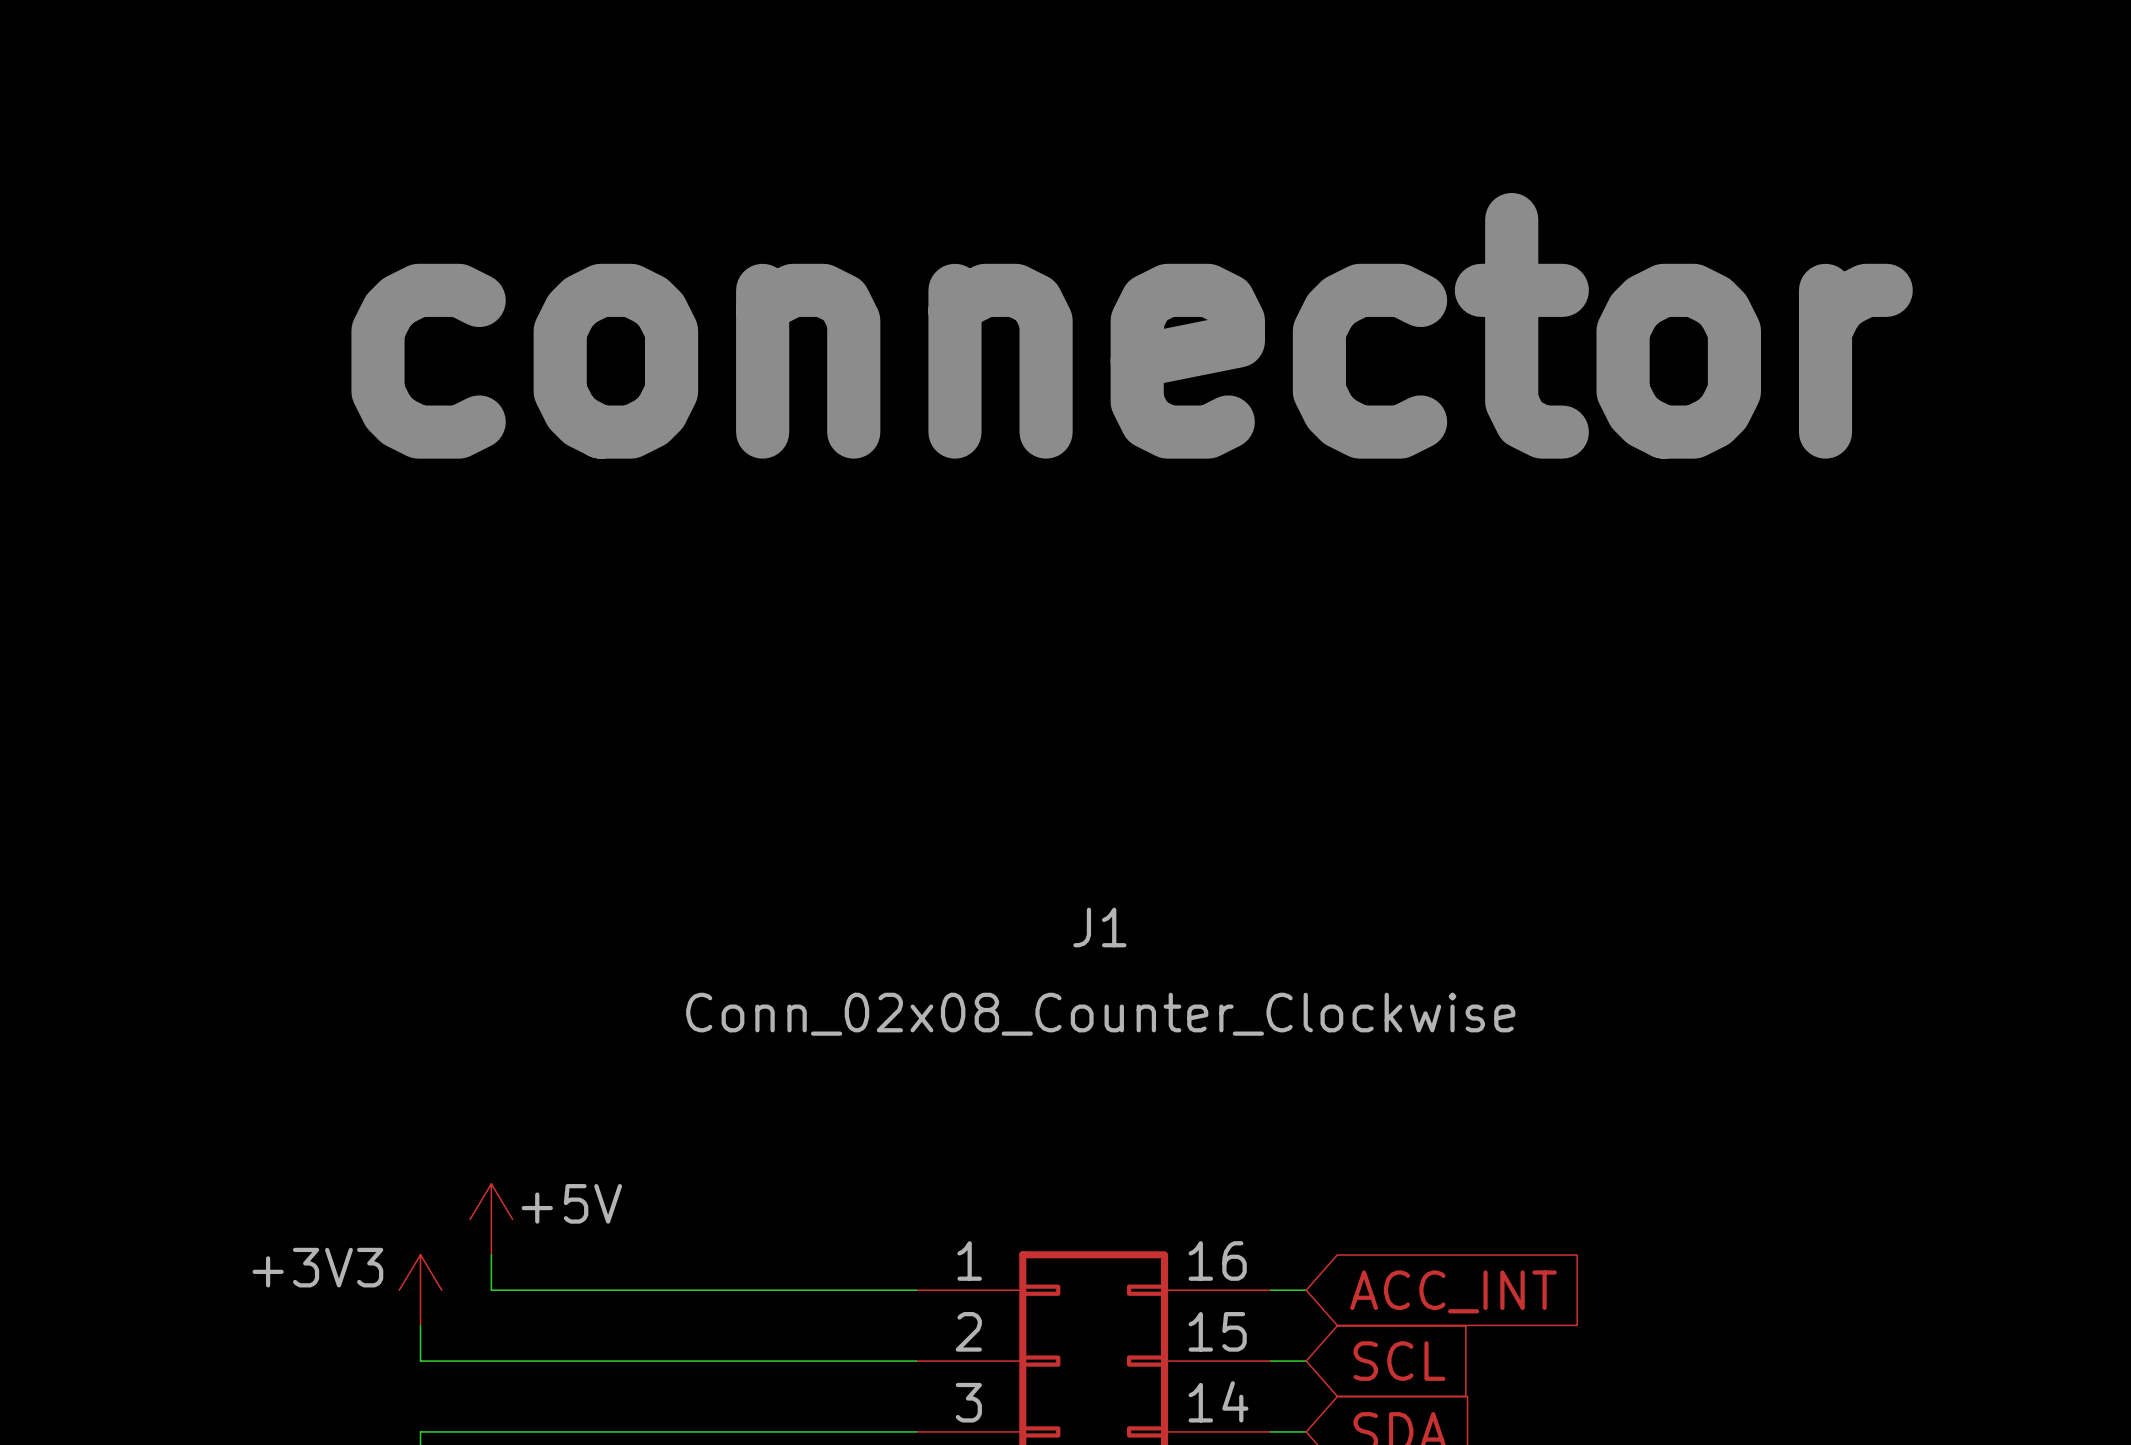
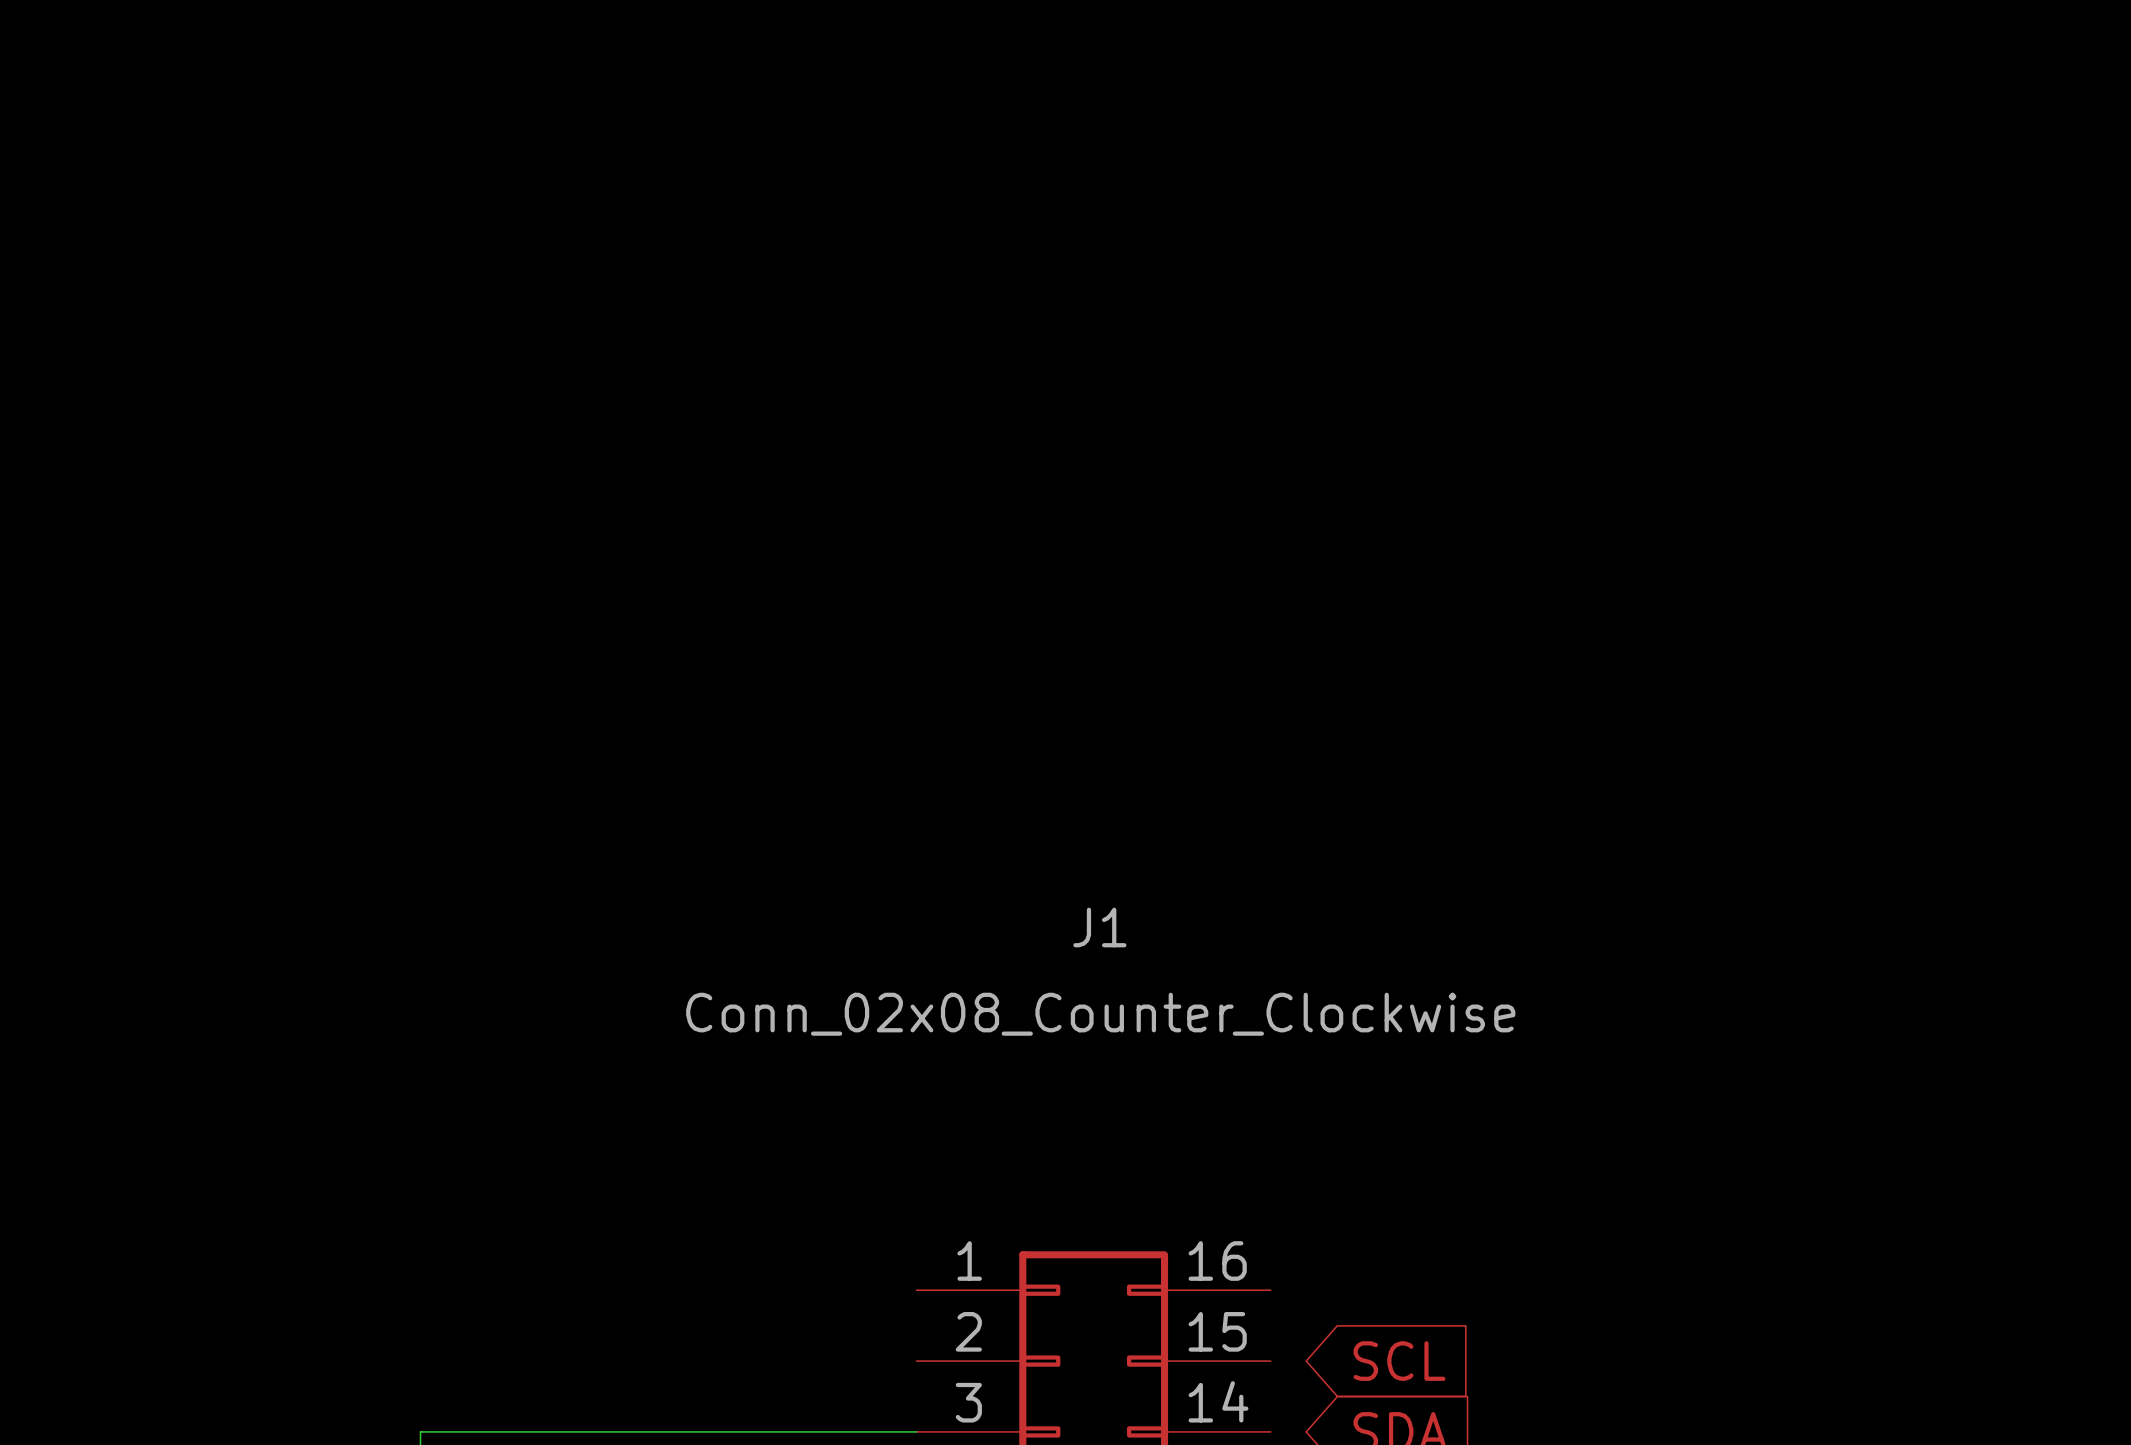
text: connector (1132, 325) -> none
power symbol: +5V (491, 1219) -> none
wire: (491, 1254) (491, 1290) (916, 1290) -> none
power symbol: +3V3 (420, 1290) -> none
wire: (1270, 1290) (1306, 1290) -> none
global label: ACC_INT (1453, 1291) -> none
wire: (420, 1325) (420, 1361) (916, 1361) -> none
wire: (1270, 1361) (1306, 1361) -> none
wire: (1270, 1431) (1306, 1431) -> none

